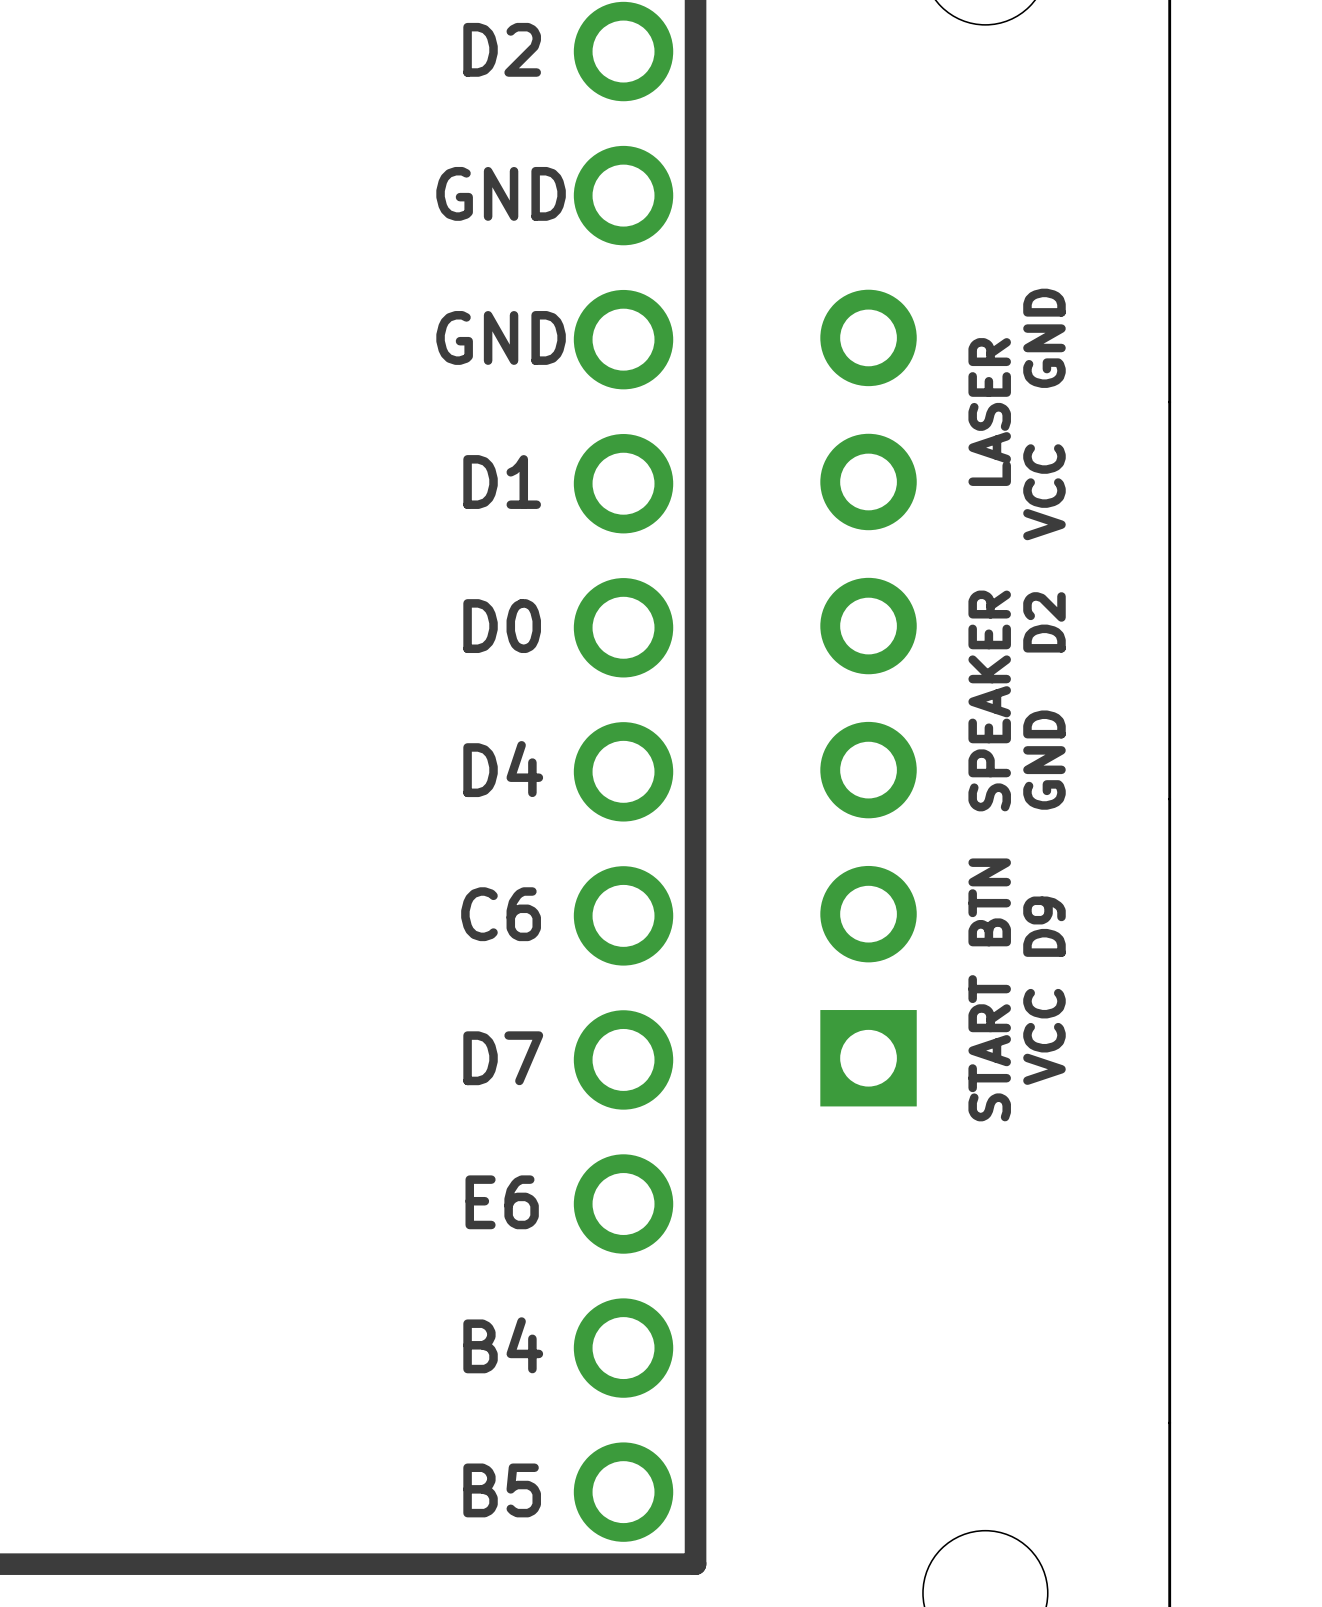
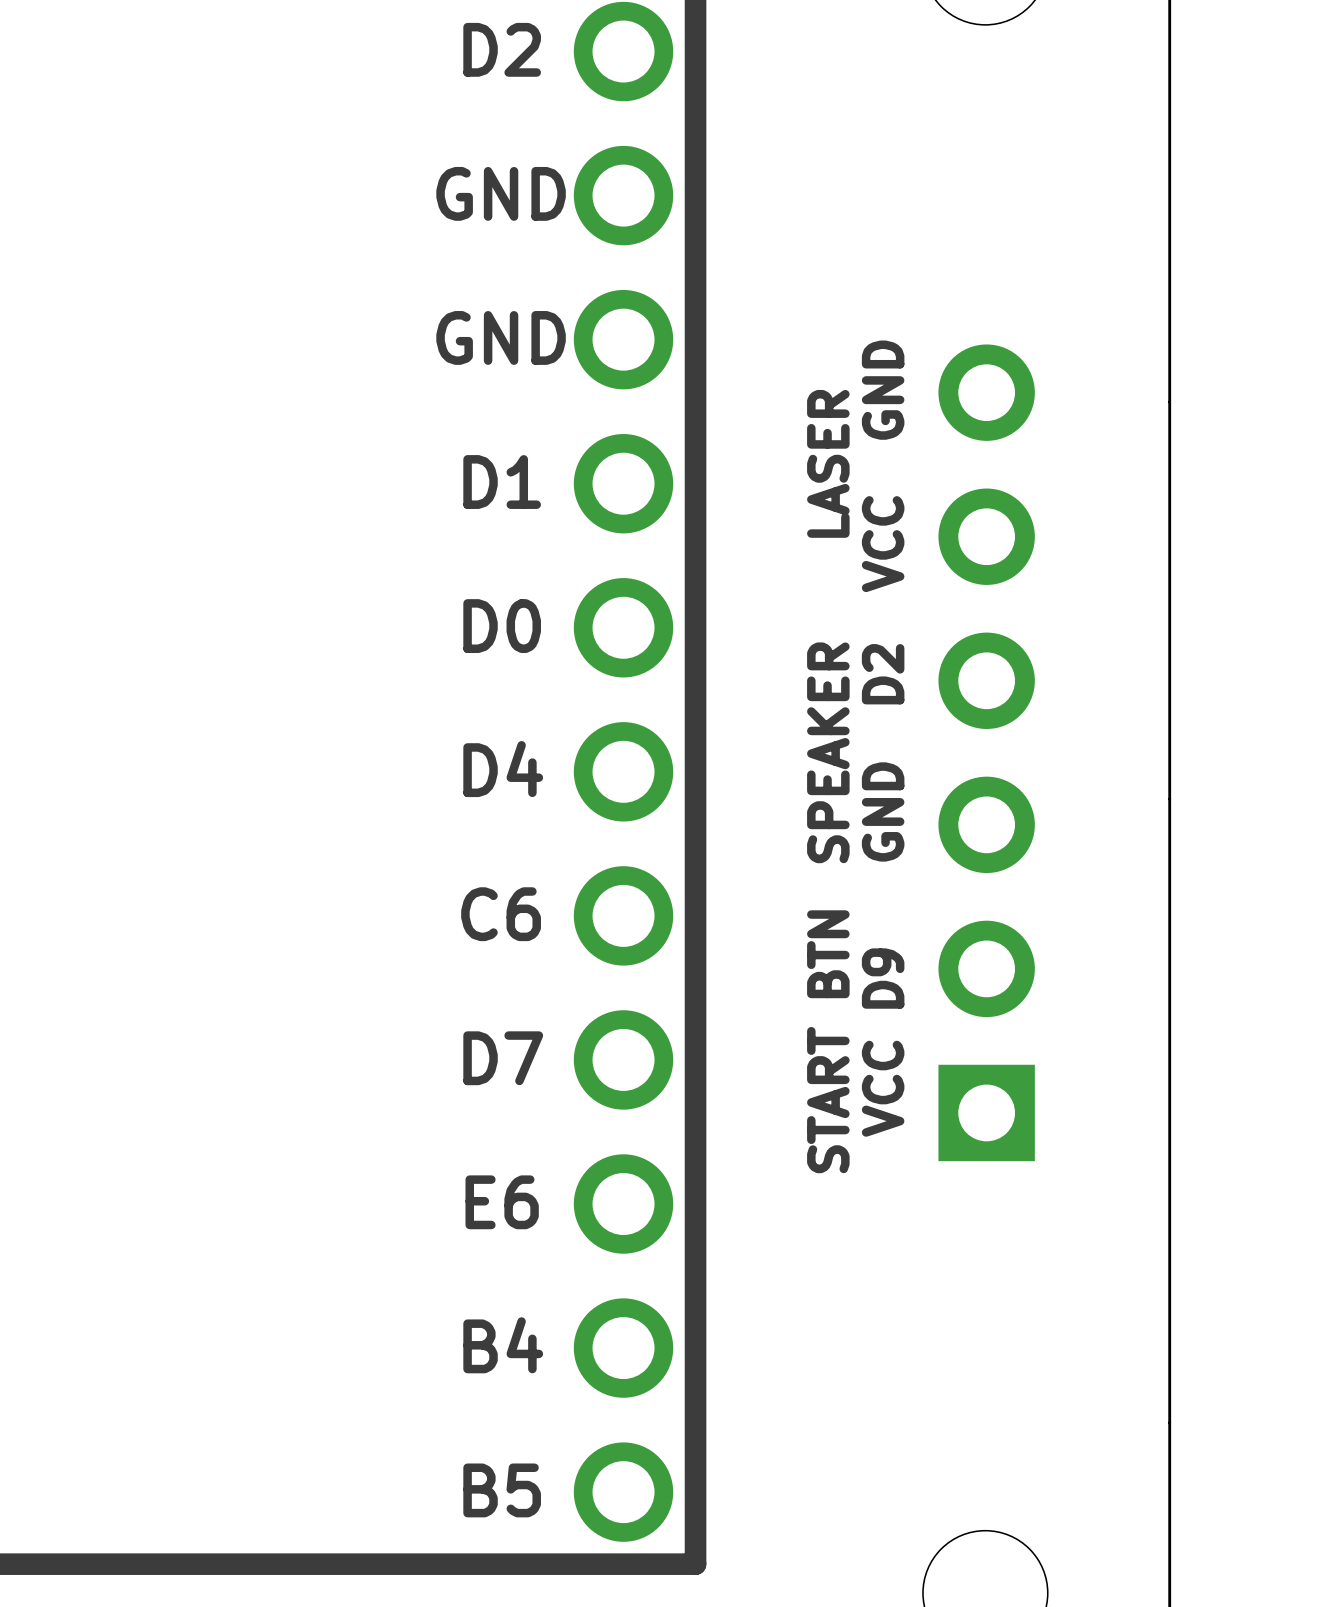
text position: LASER (989, 412) -> LASER (828, 463)
text position: VCC GND (1044, 414) -> VCC GND (883, 466)
part position: (868, 698) -> (986, 752)
text position: SPEAKER (989, 700) -> SPEAKER (828, 752)
text position: GND D2 (1044, 700) -> GND D2 (883, 752)
text position: START BTN (989, 989) -> START BTN (828, 1041)
text position: VCC D9 (1044, 990) -> VCC D9 (883, 1042)

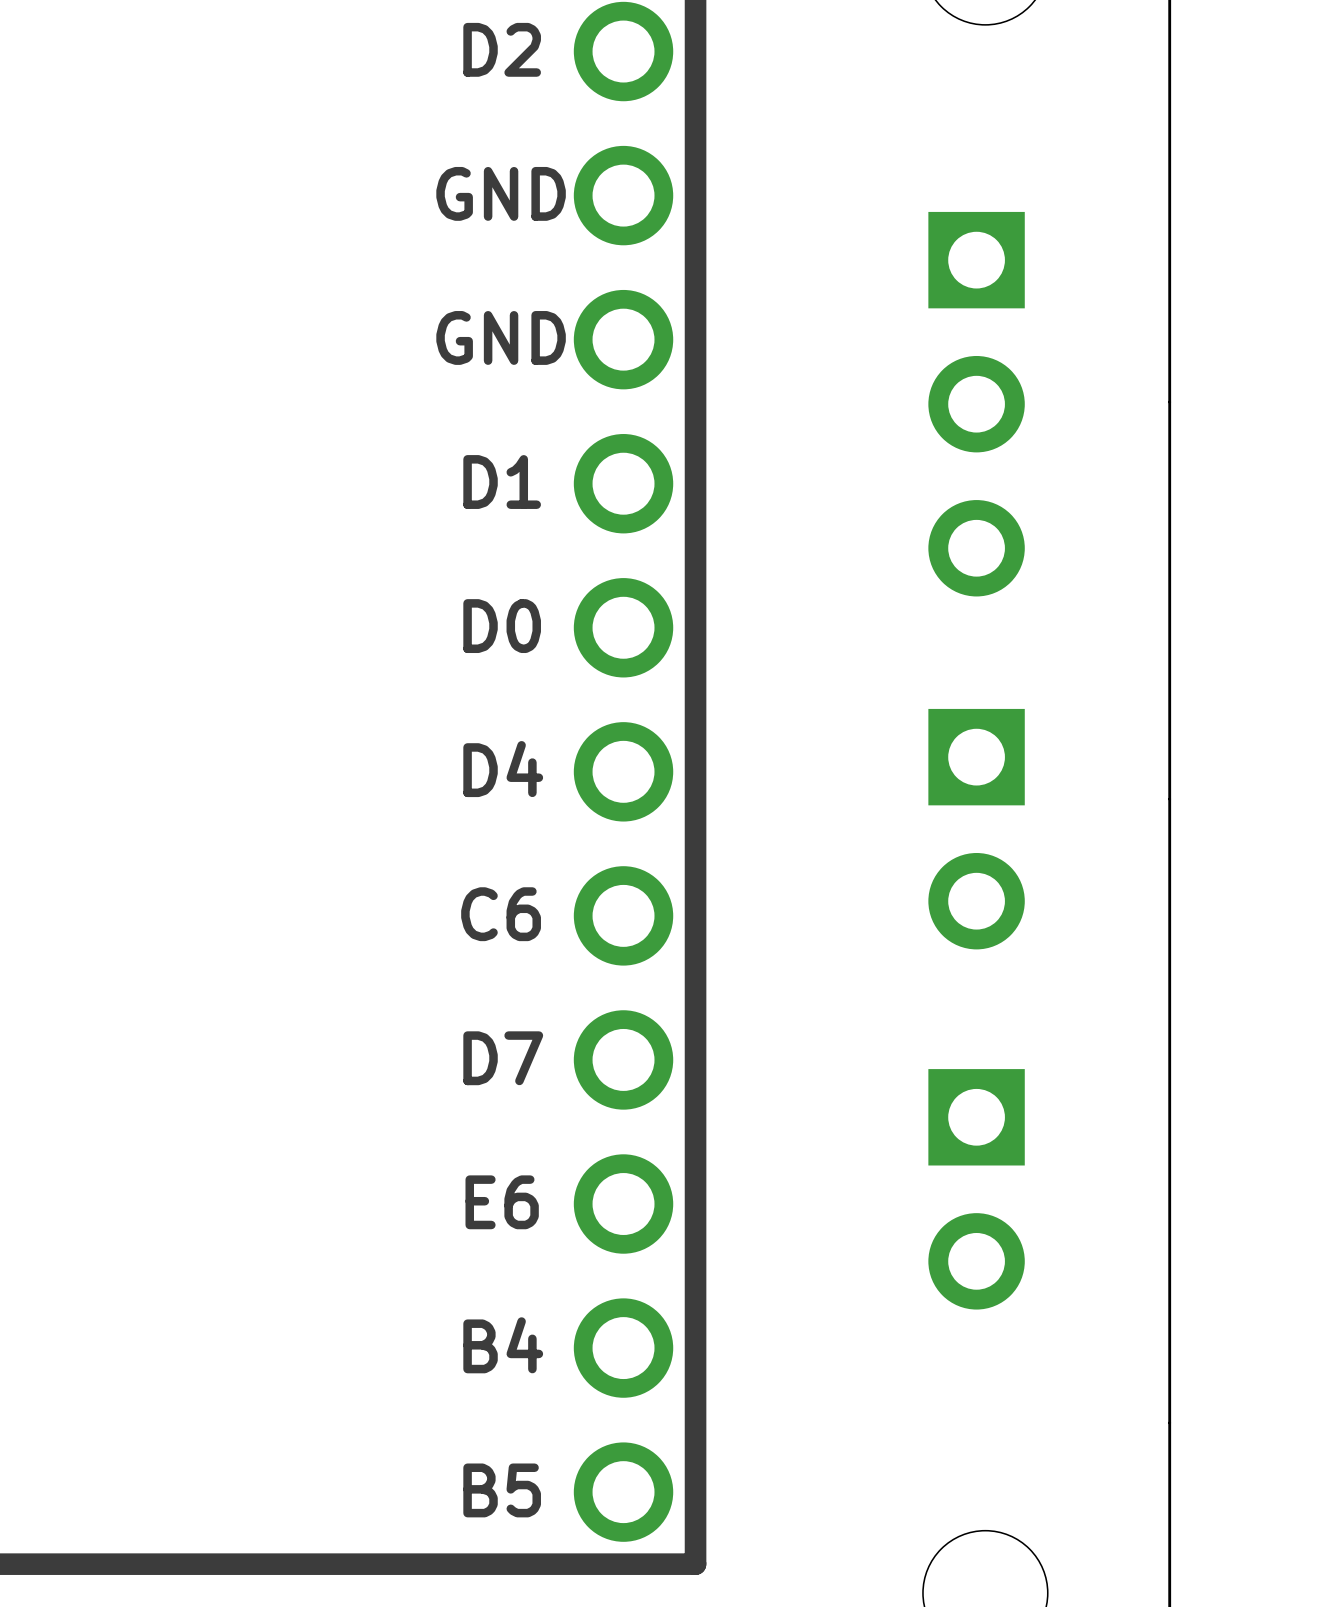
part: none -> (976, 404)
text: LASER (828, 463) -> none
text: VCC GND (883, 466) -> none
text: SPEAKER (828, 752) -> none
text: GND D2 (883, 752) -> none
part: (986, 752) -> none
part: none -> (976, 829)
text: START BTN (828, 1041) -> none
text: VCC D9 (883, 1042) -> none
part: none -> (976, 1189)

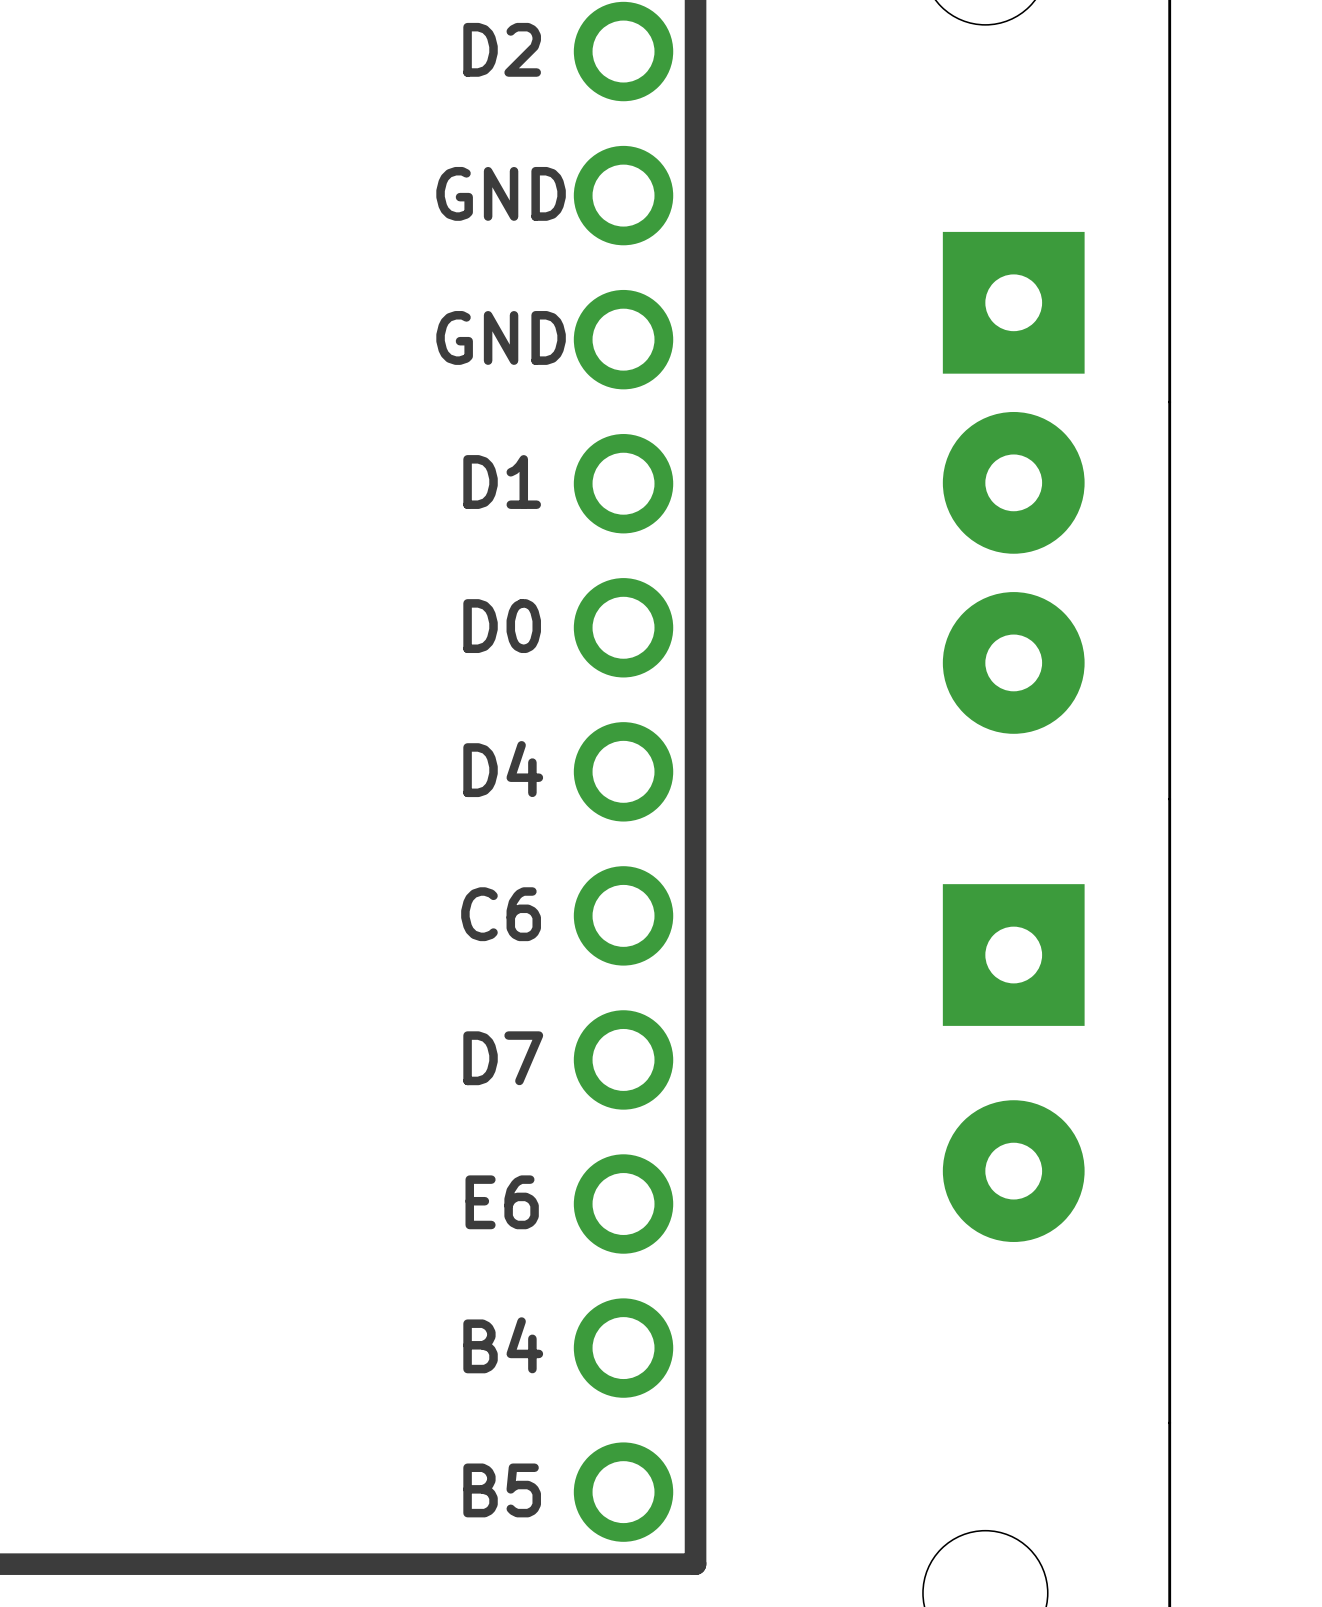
part: (976, 404) -> none
part: none -> (1013, 482)
part: (976, 829) -> none
part: none -> (1013, 1063)
part: (976, 1189) -> none

